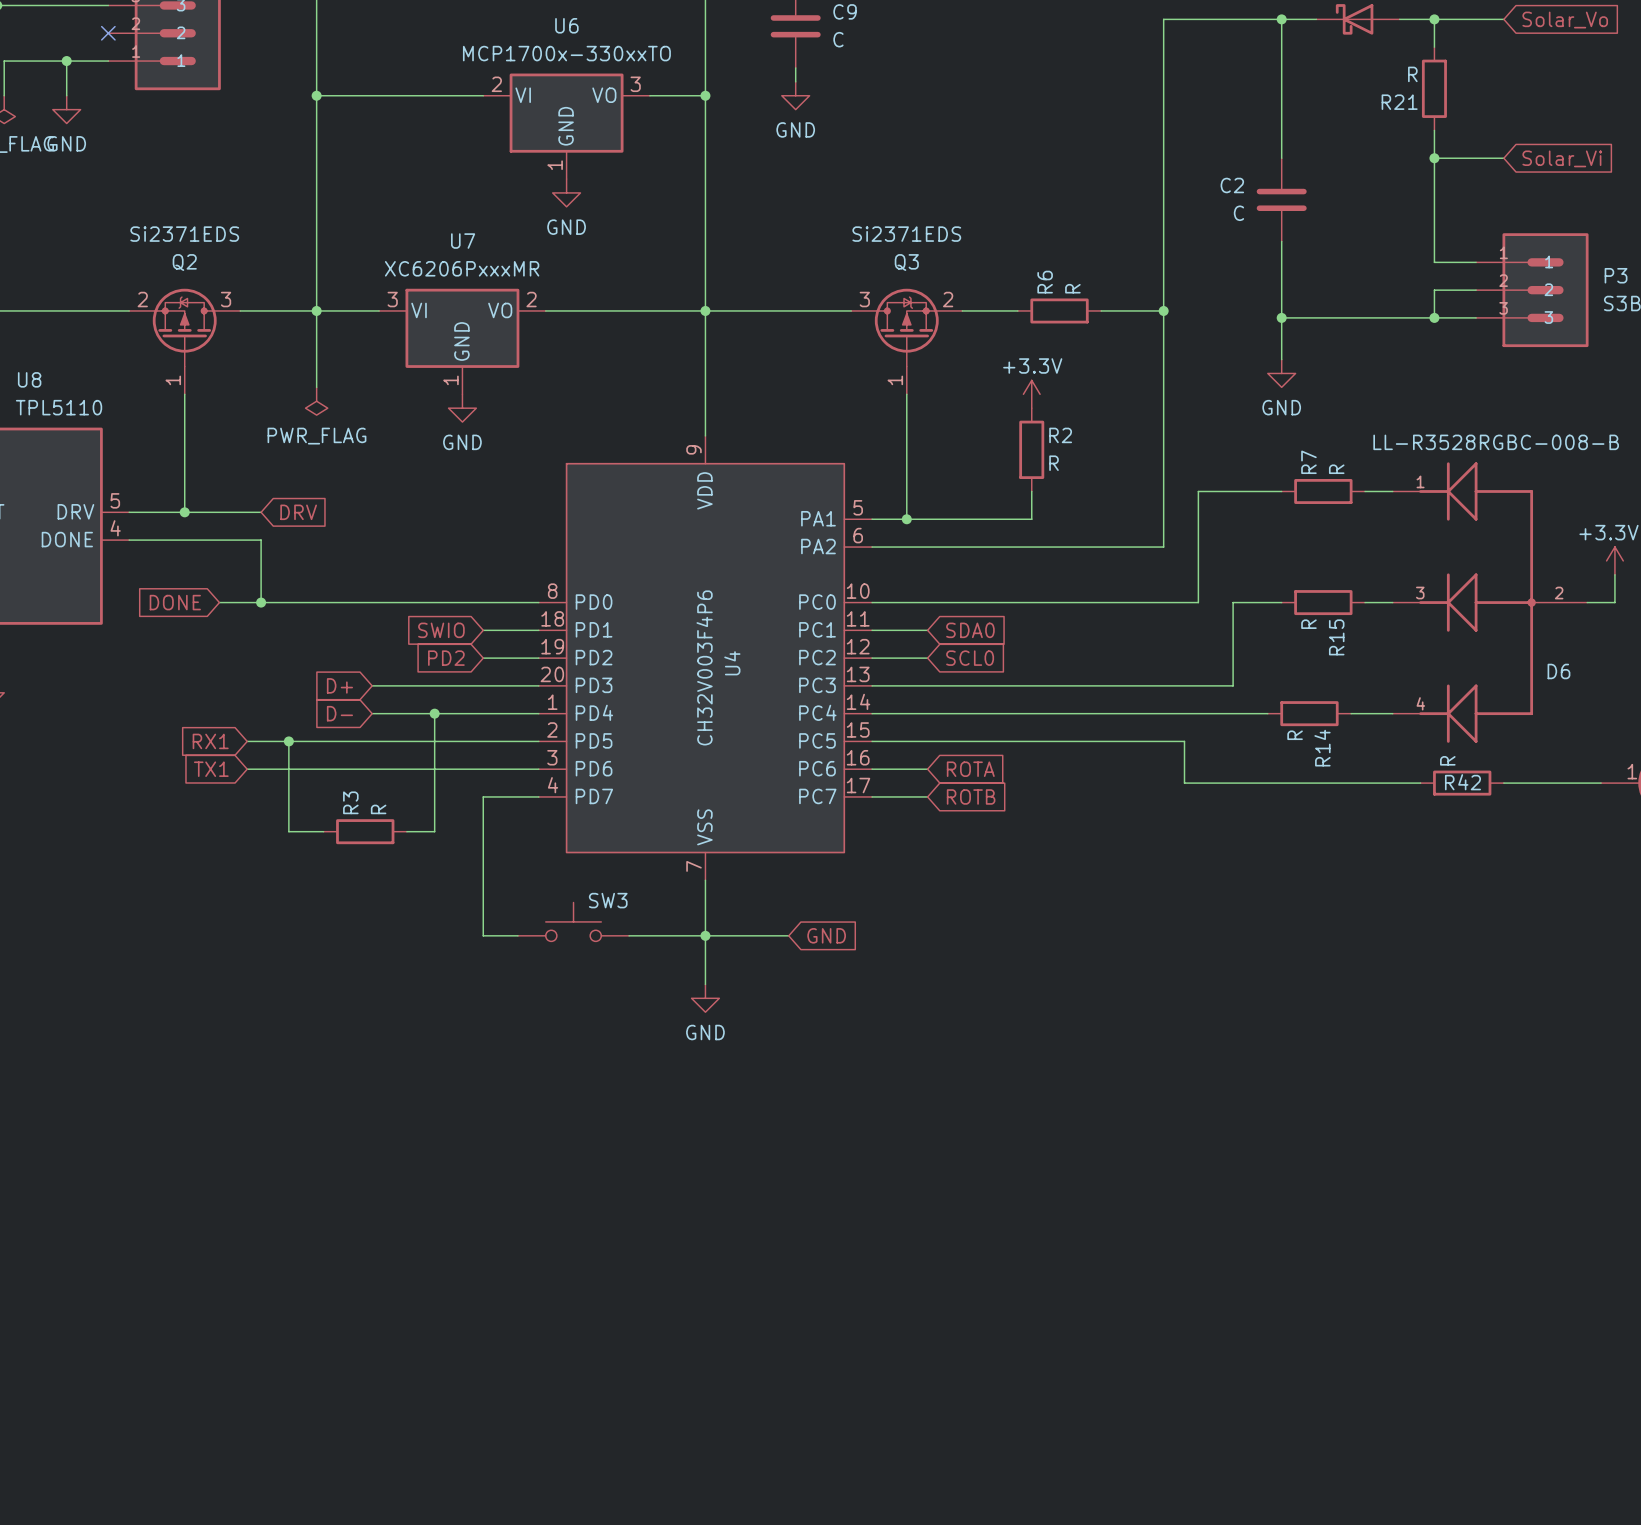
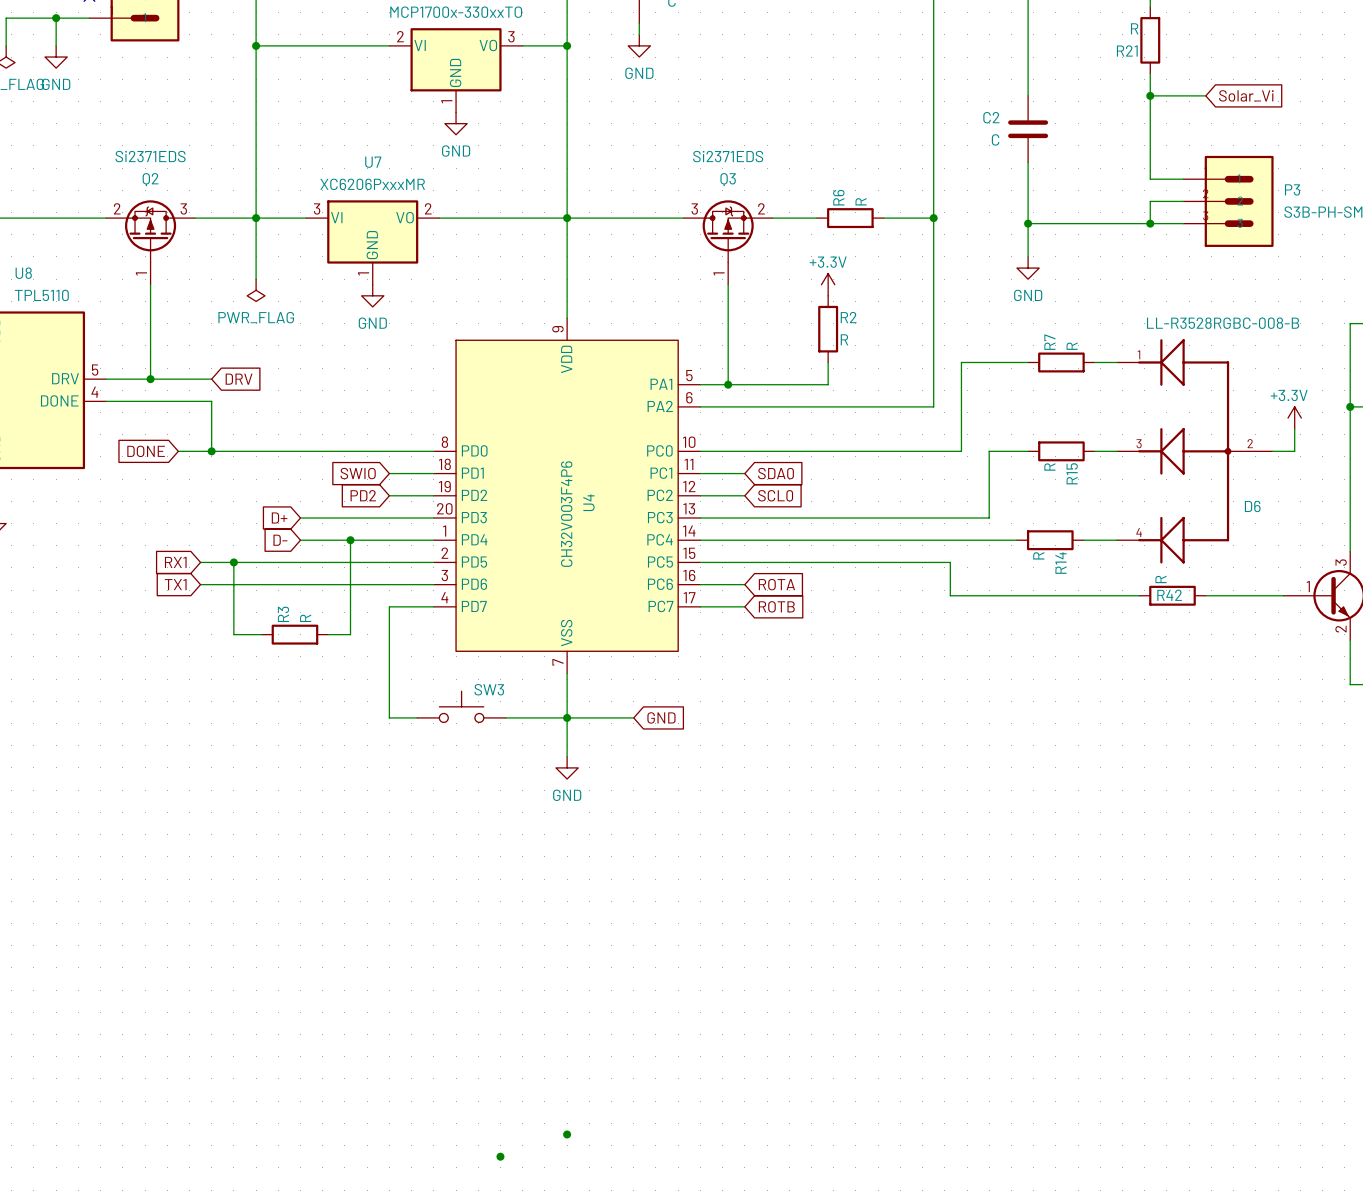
junction: none -> (567, 1134)
junction: none -> (500, 1156)

